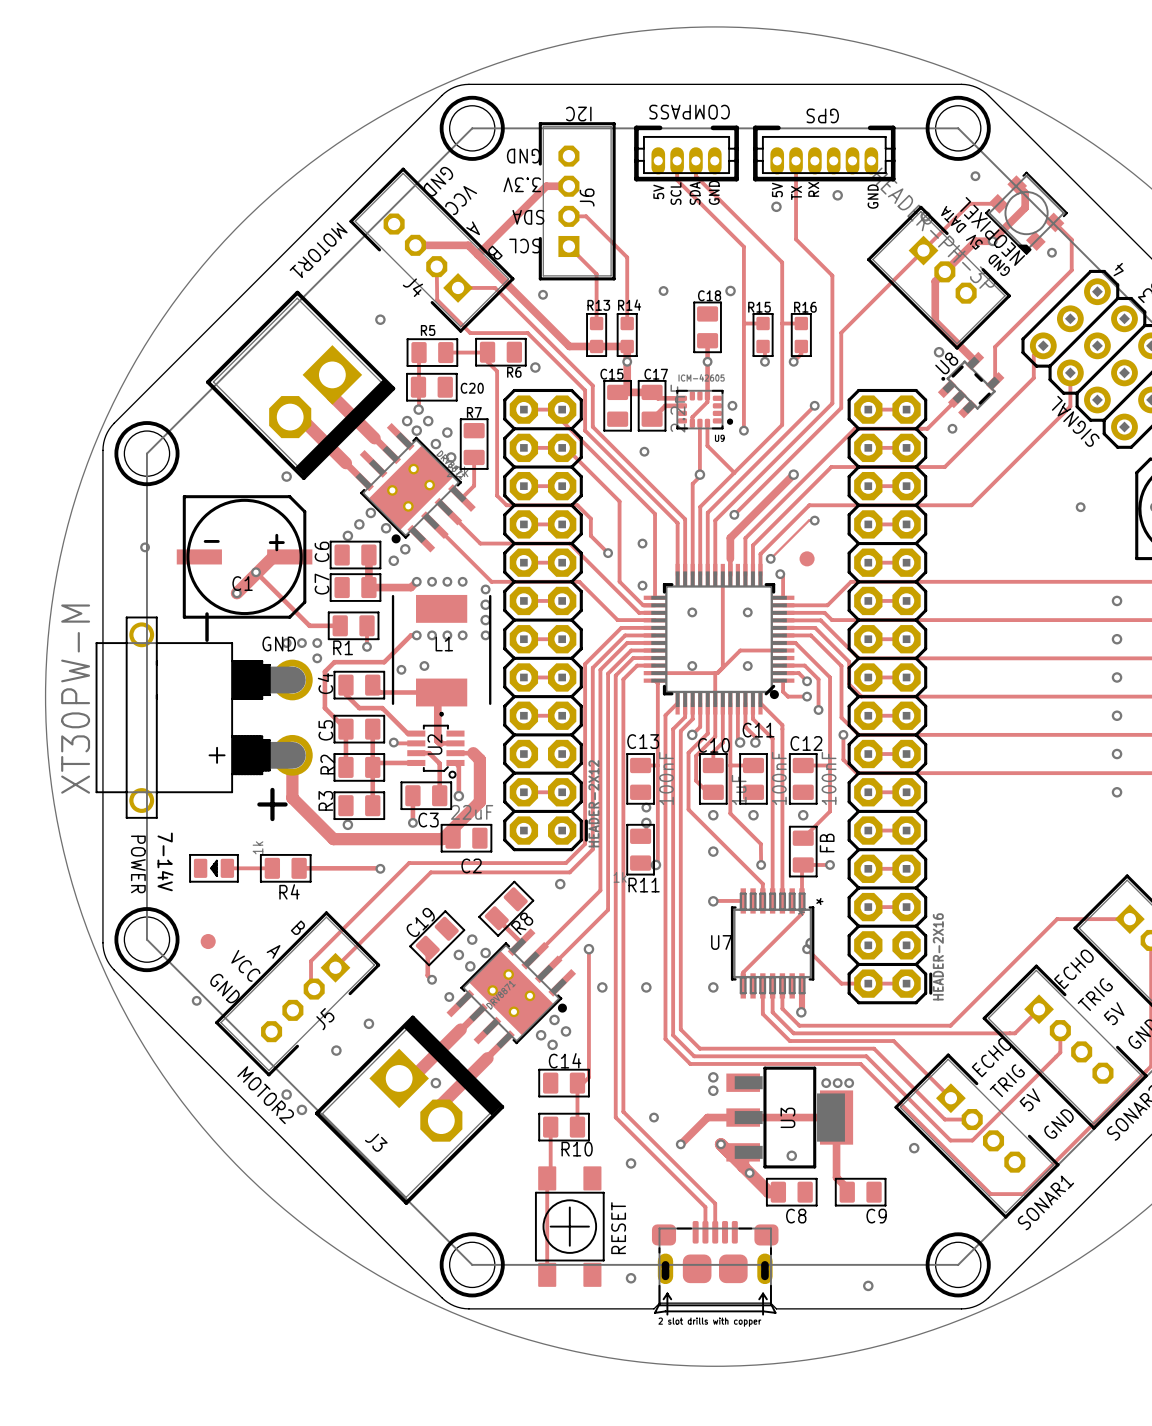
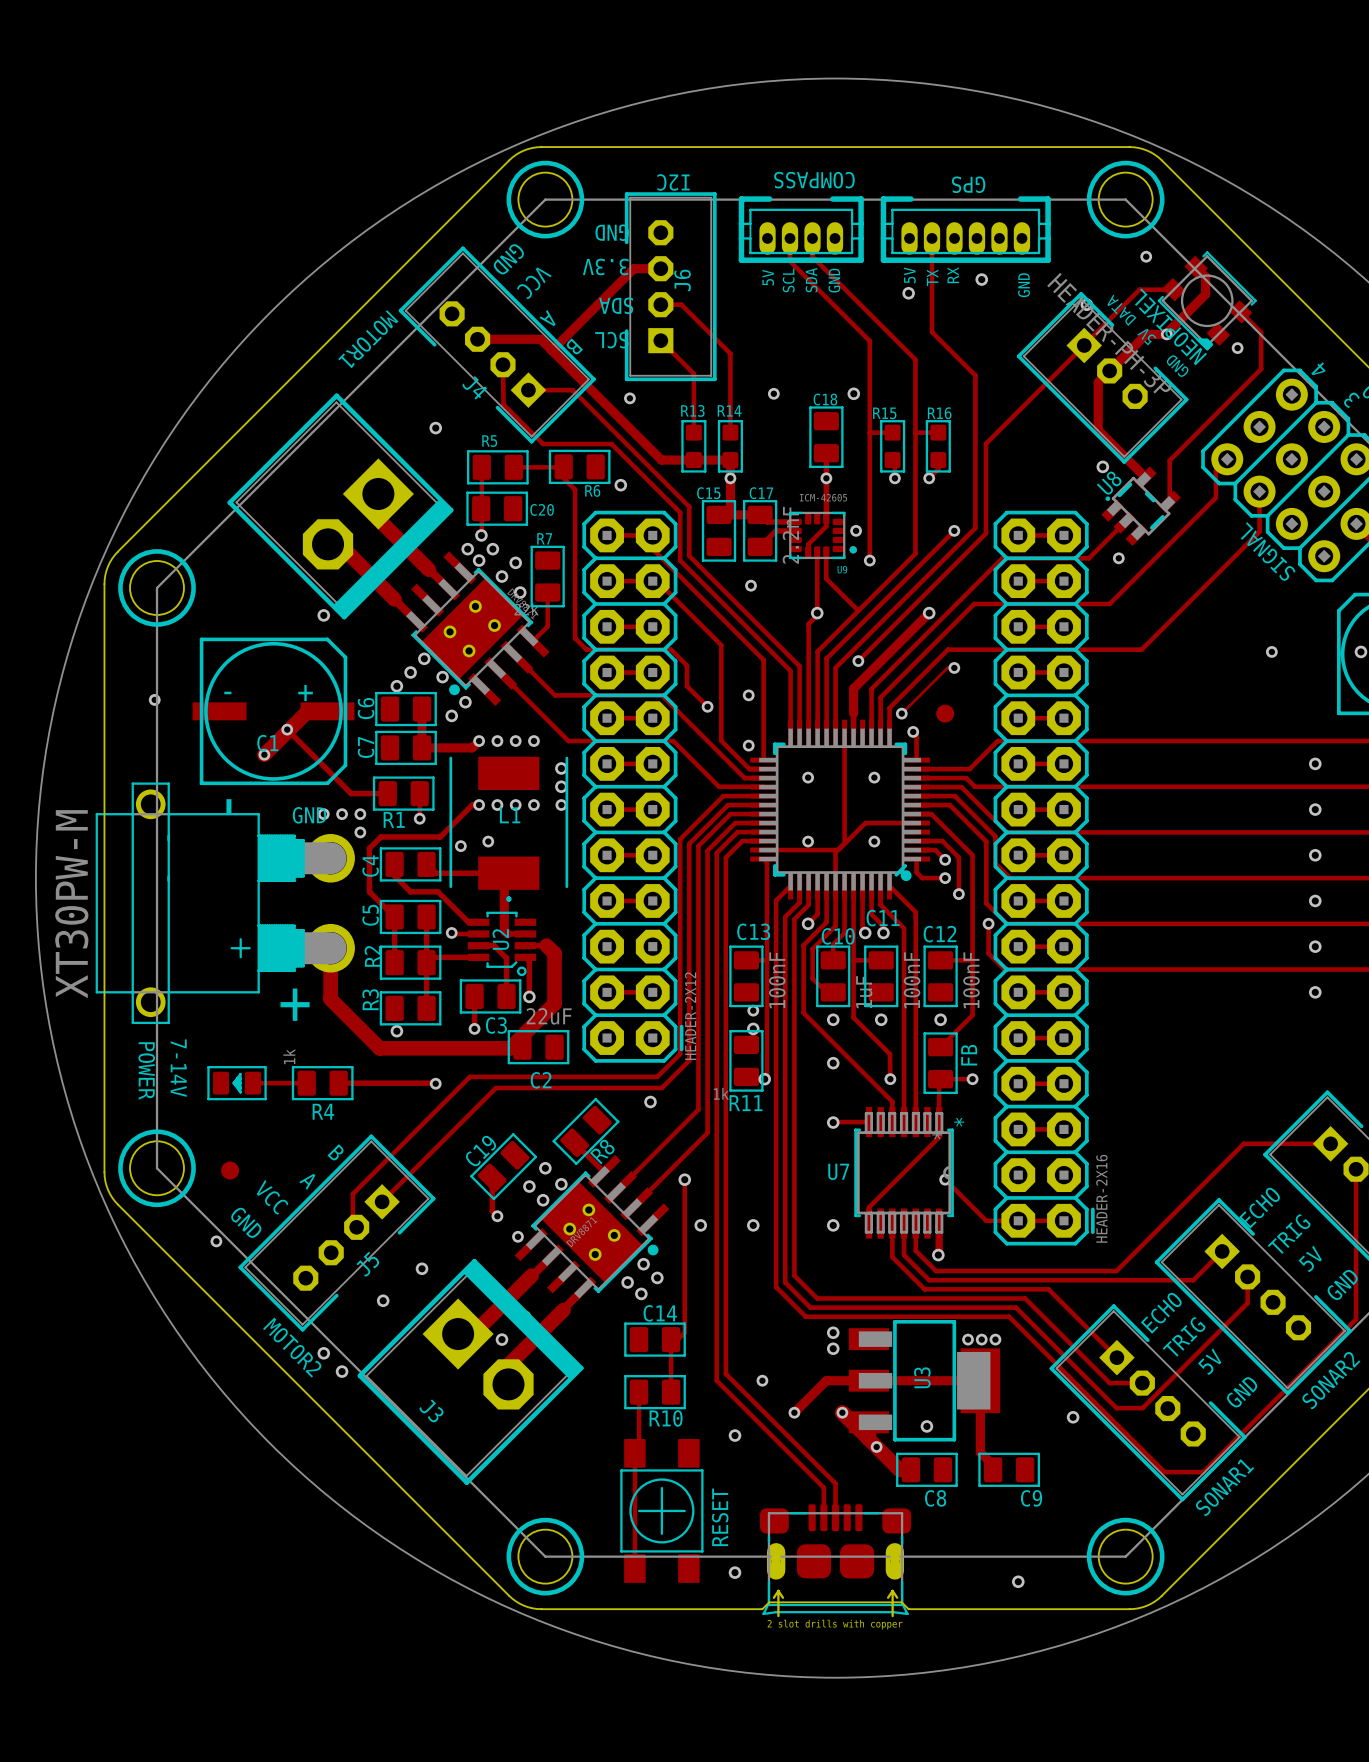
via: (485, 589) -> none

